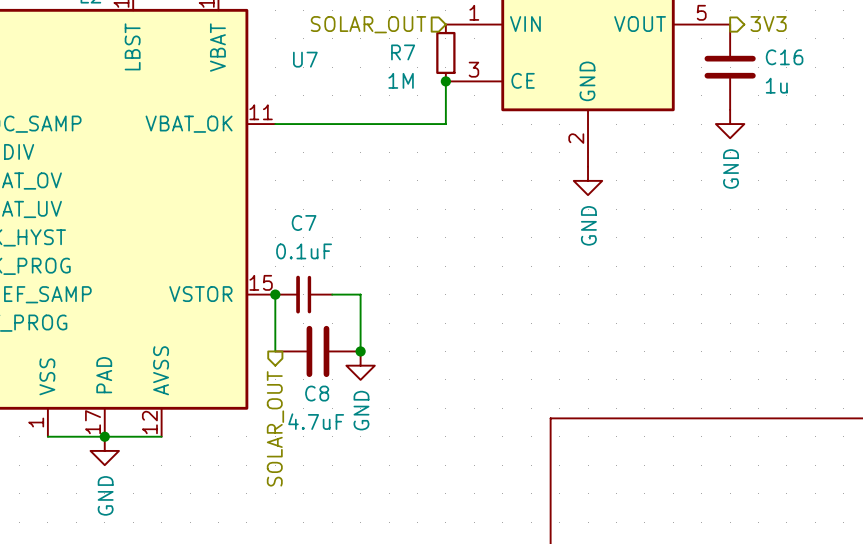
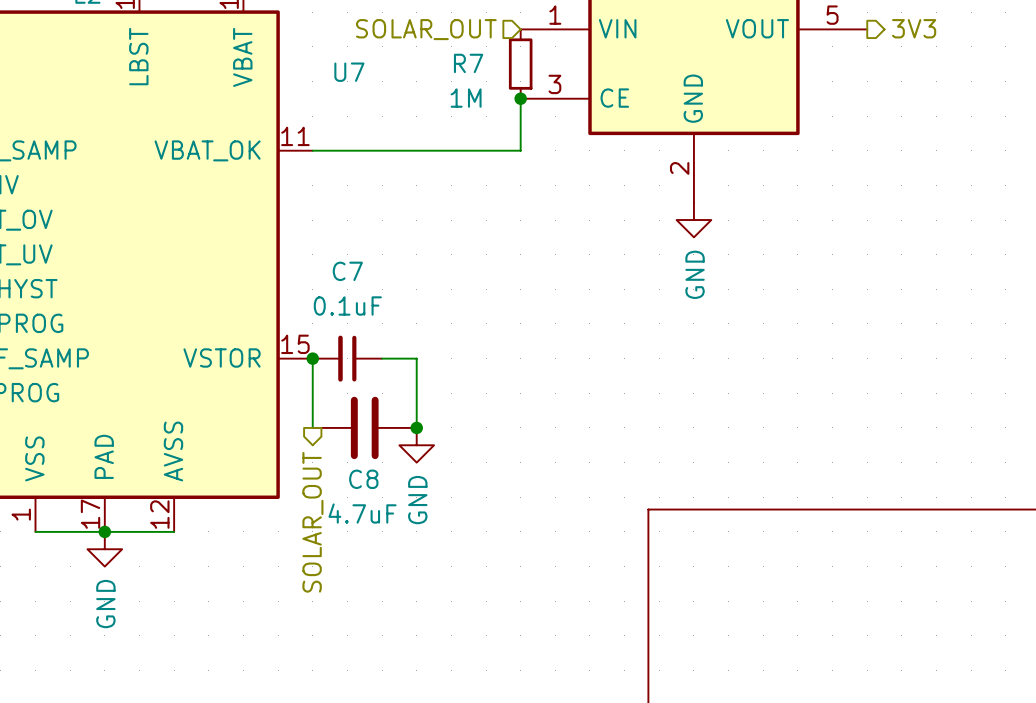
C16: 1u (730, 67) -> none
power symbol: GND (730, 124) -> none

